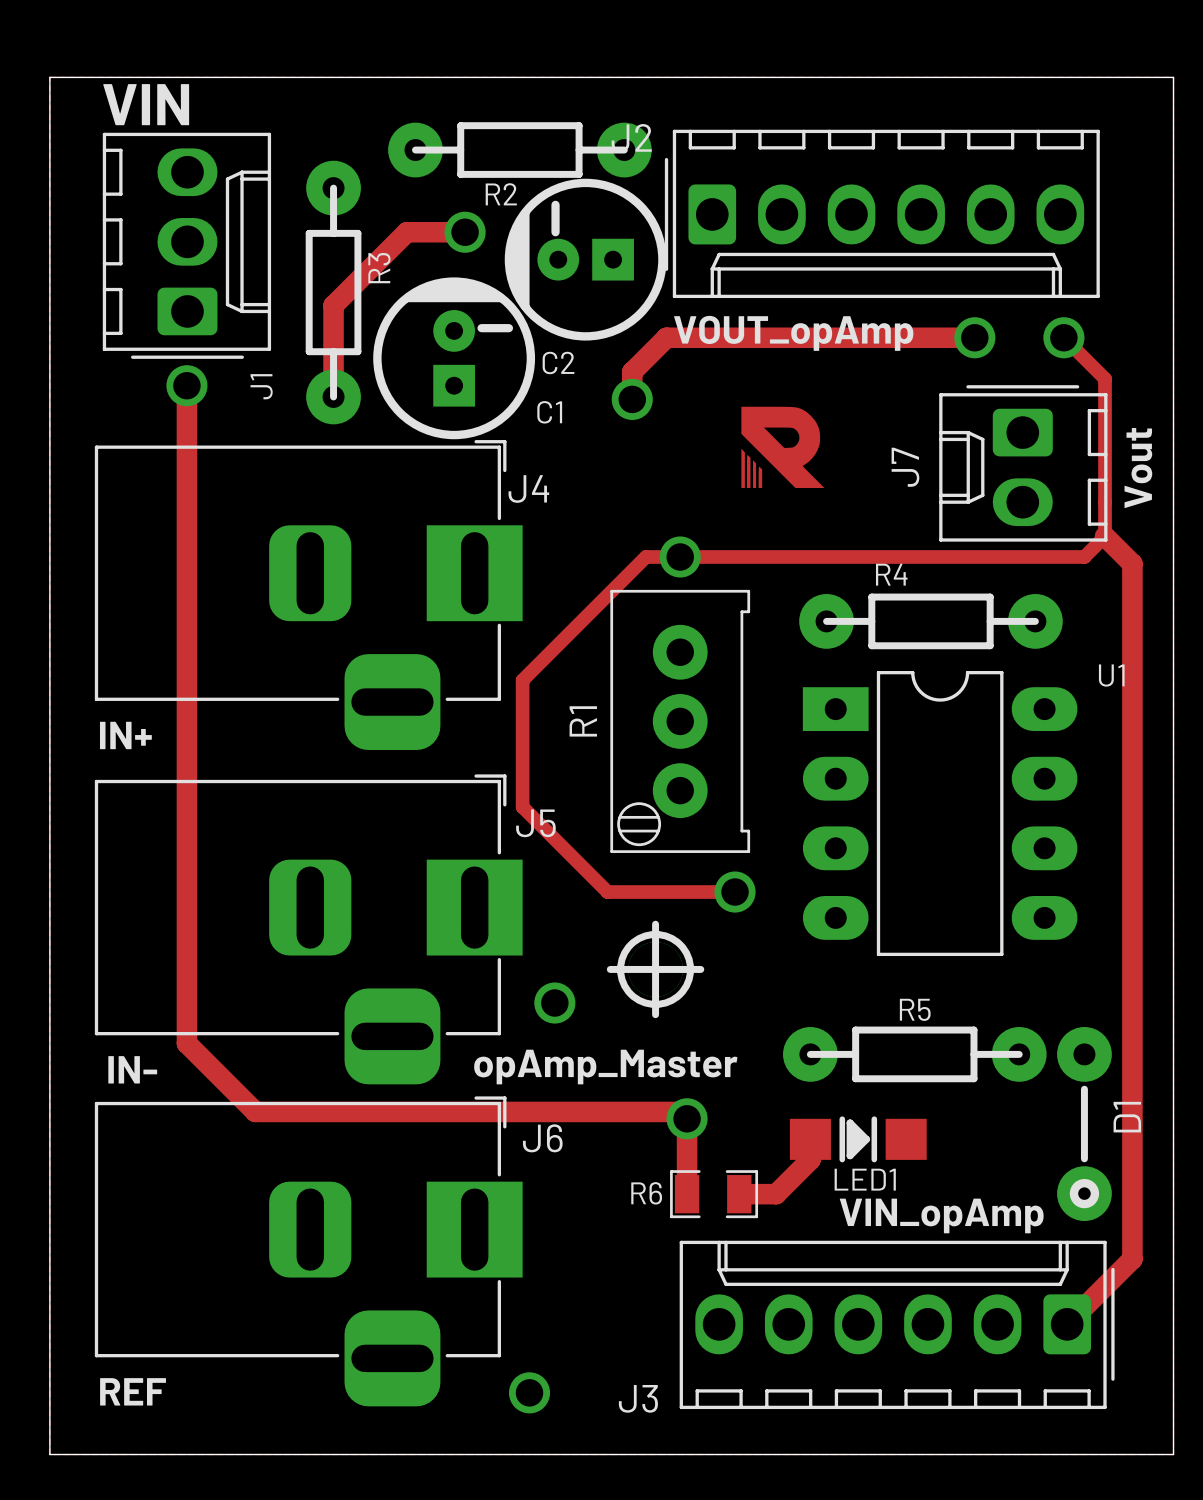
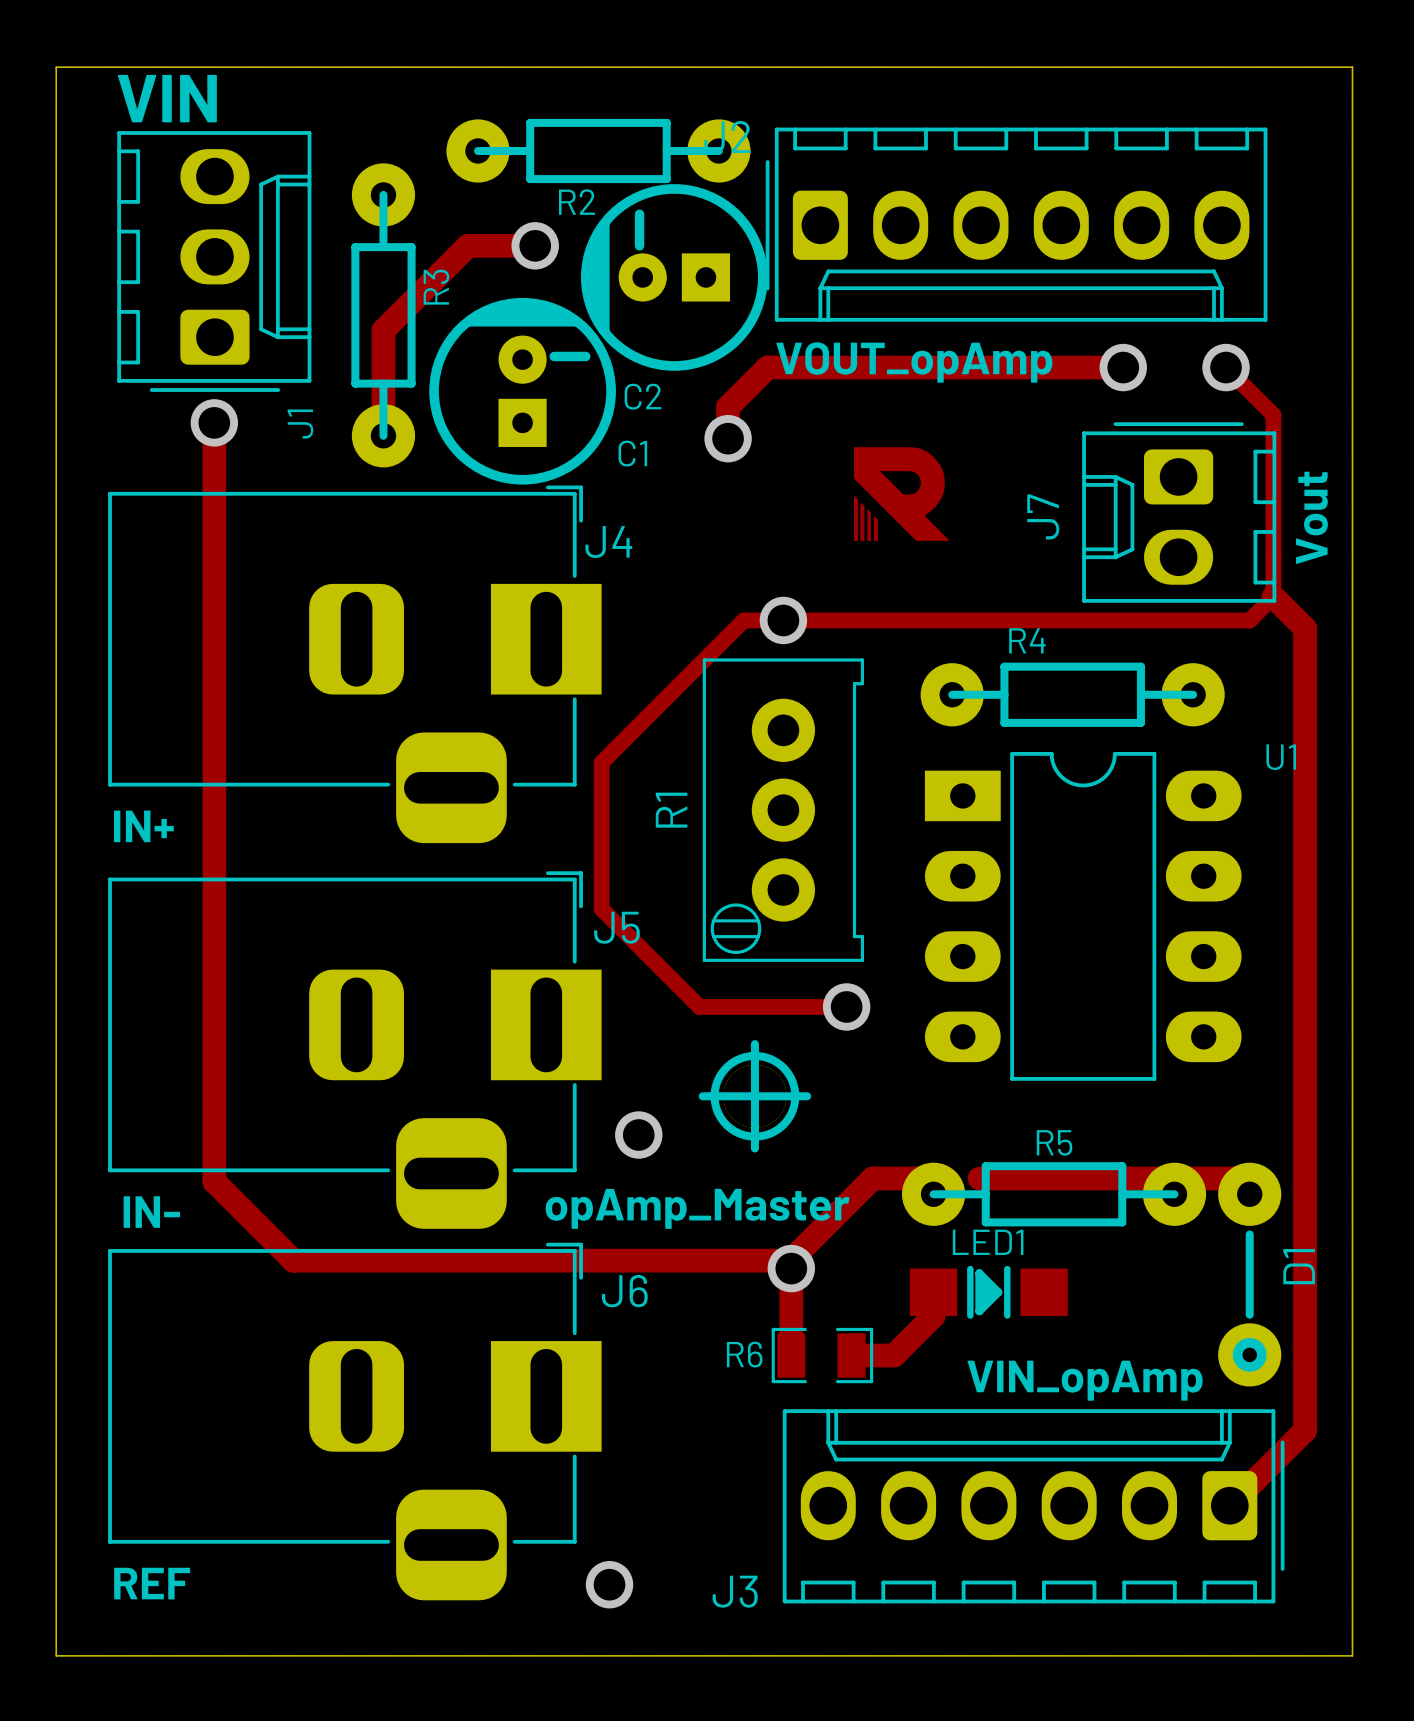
track: none -> (919, 1178) (872, 1178) (791, 1259) (791, 1268)
track: none -> (979, 1178) (1233, 1178) (1249, 1194)
LED1 name position: LED1 (865, 1179) -> LED1 (988, 1242)

